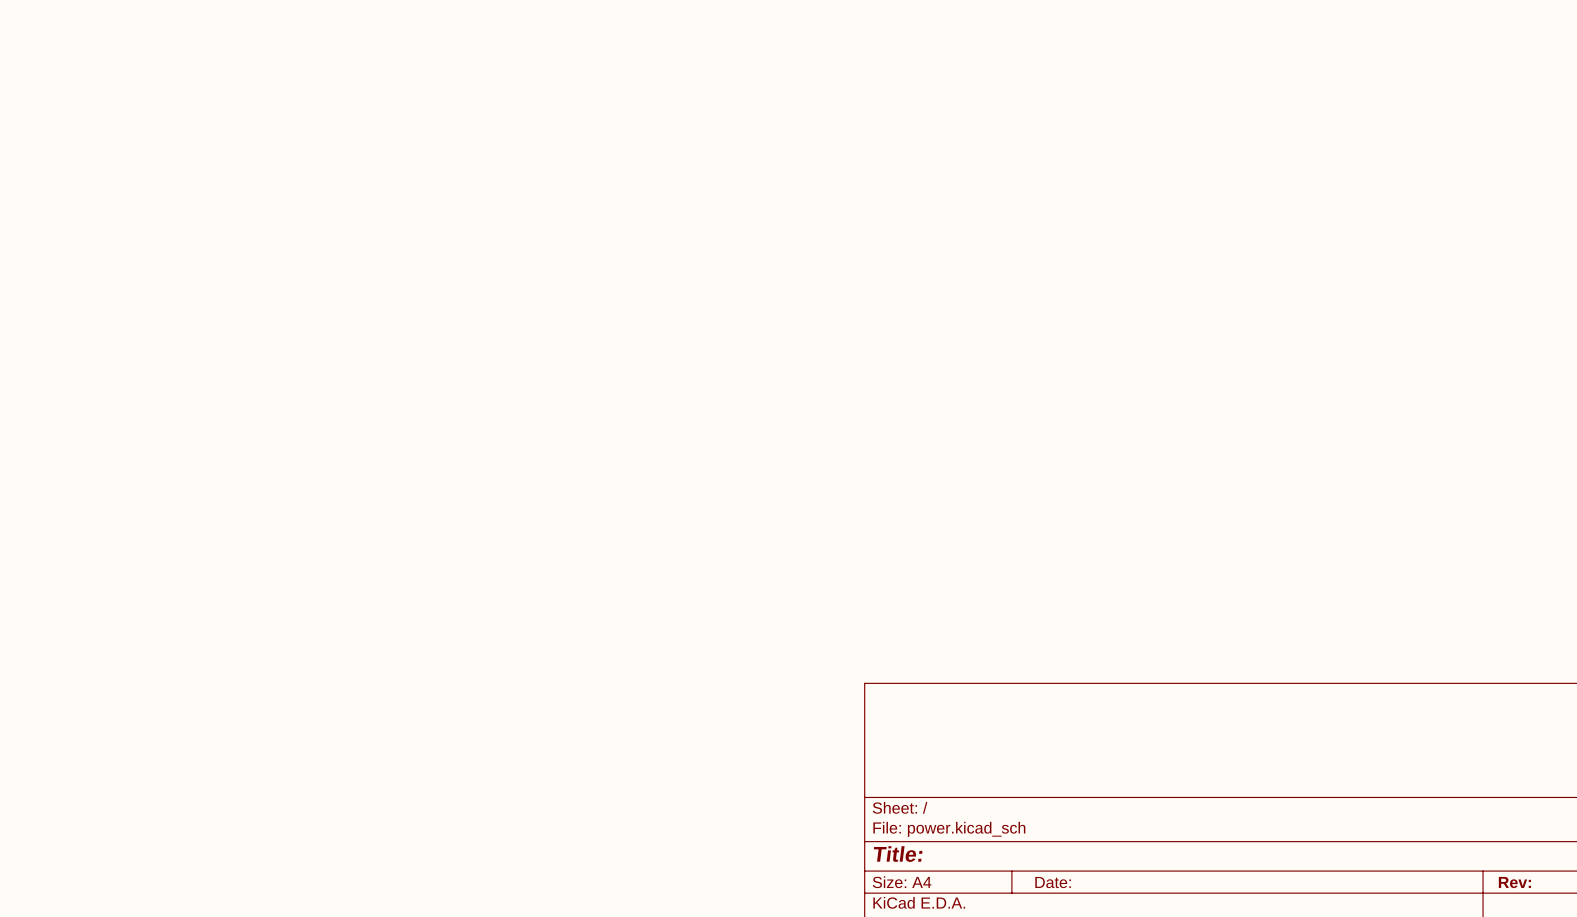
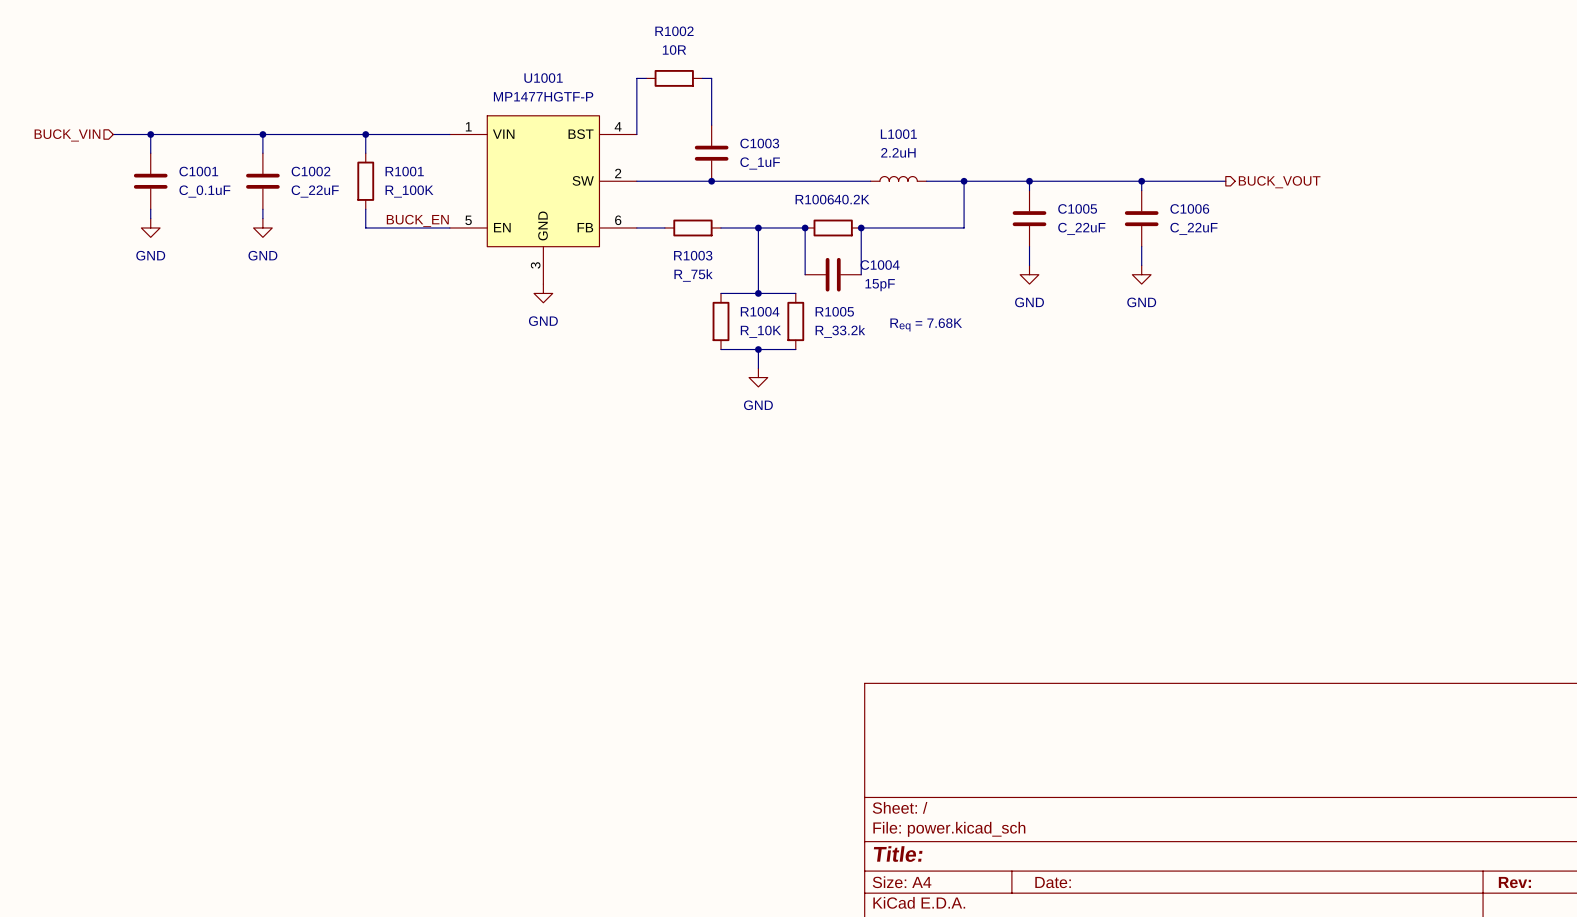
wire: none -> (646, 78) (636, 78) (636, 134)
R1002: none -> 10R (674, 78)
wire: none -> (702, 78) (711, 78) (711, 125)
wire: none -> (113, 134) (449, 134)
wire: none -> (150, 134) (150, 153)
junction: none -> (150, 134)
wire: none -> (262, 134) (262, 153)
junction: none -> (262, 134)
wire: none -> (365, 134) (365, 153)
junction: none -> (365, 134)
hierarchical label: none -> BUCK_VIN (67, 135)
C1003: none -> C_1uF (711, 153)
L1001: none -> 2.2uH (898, 178)
C1001: none -> C_0.1uF (150, 181)
C1002: none -> C_22uF (262, 181)
R1001: none -> R_100K (365, 181)
wire: none -> (636, 181) (870, 181)
junction: none -> (711, 181)
wire: none -> (926, 181) (1225, 181)
wire: none -> (964, 181) (964, 227) (861, 227) (861, 274)
junction: none -> (964, 181)
wire: none -> (1029, 181) (1029, 190)
junction: none -> (1029, 181)
wire: none -> (1141, 181) (1141, 190)
junction: none -> (1141, 181)
hierarchical label: none -> BUCK_VOUT (1279, 182)
U1001: none -> MP1477HGTF-P (543, 199)
wire: none -> (150, 209) (150, 218)
wire: none -> (262, 209) (262, 218)
wire: none -> (365, 209) (365, 227) (449, 227)
C1005: none -> C_22uF (1029, 218)
C1006: none -> C_22uF (1141, 218)
label: none -> BUCK_EN (417, 220)
power symbol: none -> GND (150, 227)
power symbol: none -> GND (262, 227)
wire: none -> (636, 227) (664, 227)
R1003: none -> R_75k (692, 227)
wire: none -> (721, 227) (805, 227) (805, 274)
wire: none -> (758, 227) (758, 293)
junction: none -> (758, 227)
junction: none -> (805, 227)
R1006: none -> 40.2K (833, 227)
junction: none -> (861, 227)
wire: none -> (1029, 246) (1029, 265)
wire: none -> (1141, 246) (1141, 265)
C1004: none -> 15pF (833, 274)
power symbol: none -> GND (1029, 274)
power symbol: none -> GND (1141, 274)
power symbol: none -> GND (543, 293)
wire: none -> (721, 293) (795, 293)
junction: none -> (758, 293)
R1004: none -> R_10K (721, 321)
R1005: none -> R_33.2k (795, 321)
text: none -> Req = 7.68K (926, 324)
wire: none -> (721, 349) (795, 349)
wire: none -> (758, 349) (758, 368)
junction: none -> (758, 349)
power symbol: none -> GND (758, 377)

